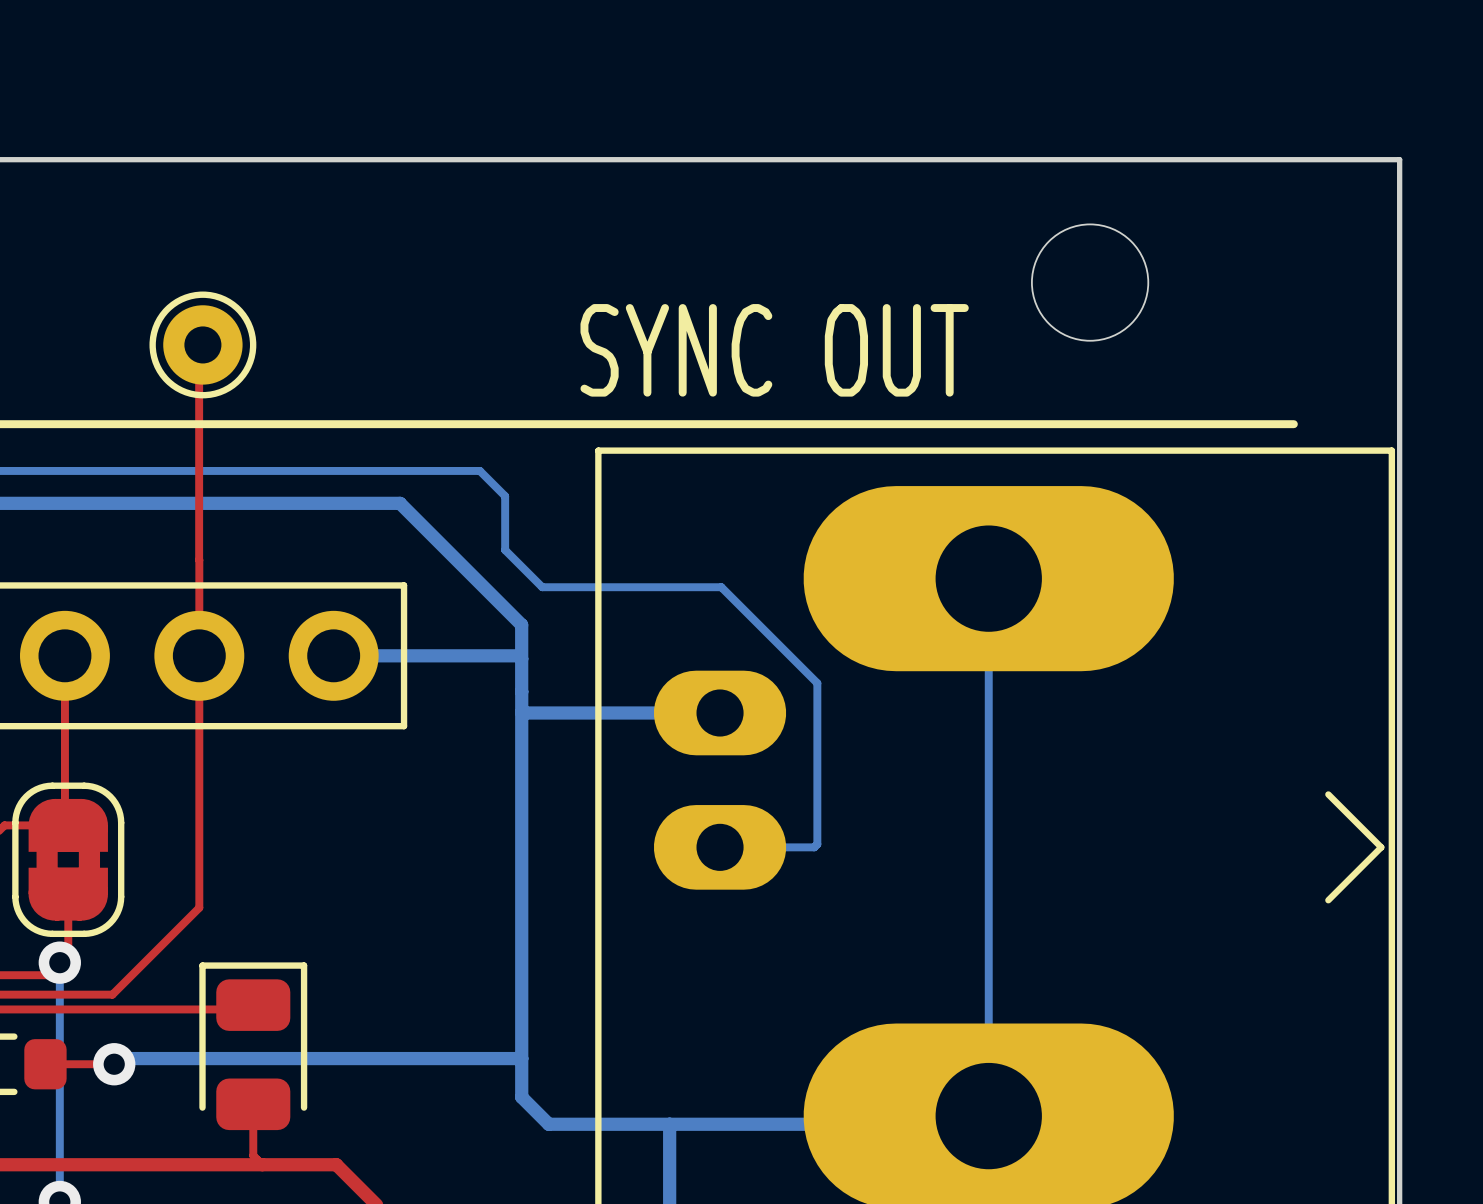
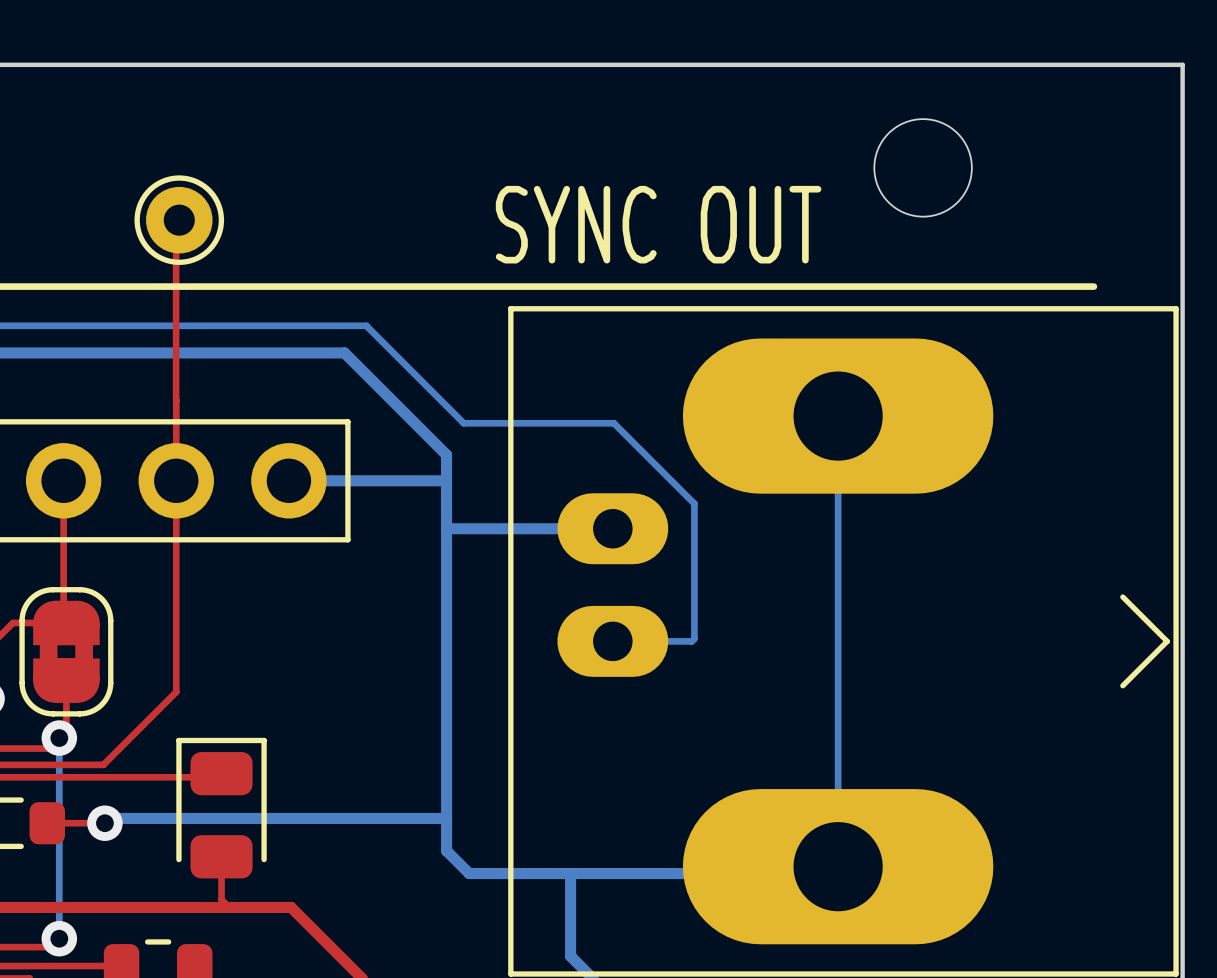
bottom track: (426, 470) (479, 470) (505, 496) (505, 550) -> (366, 325) (432, 392)

